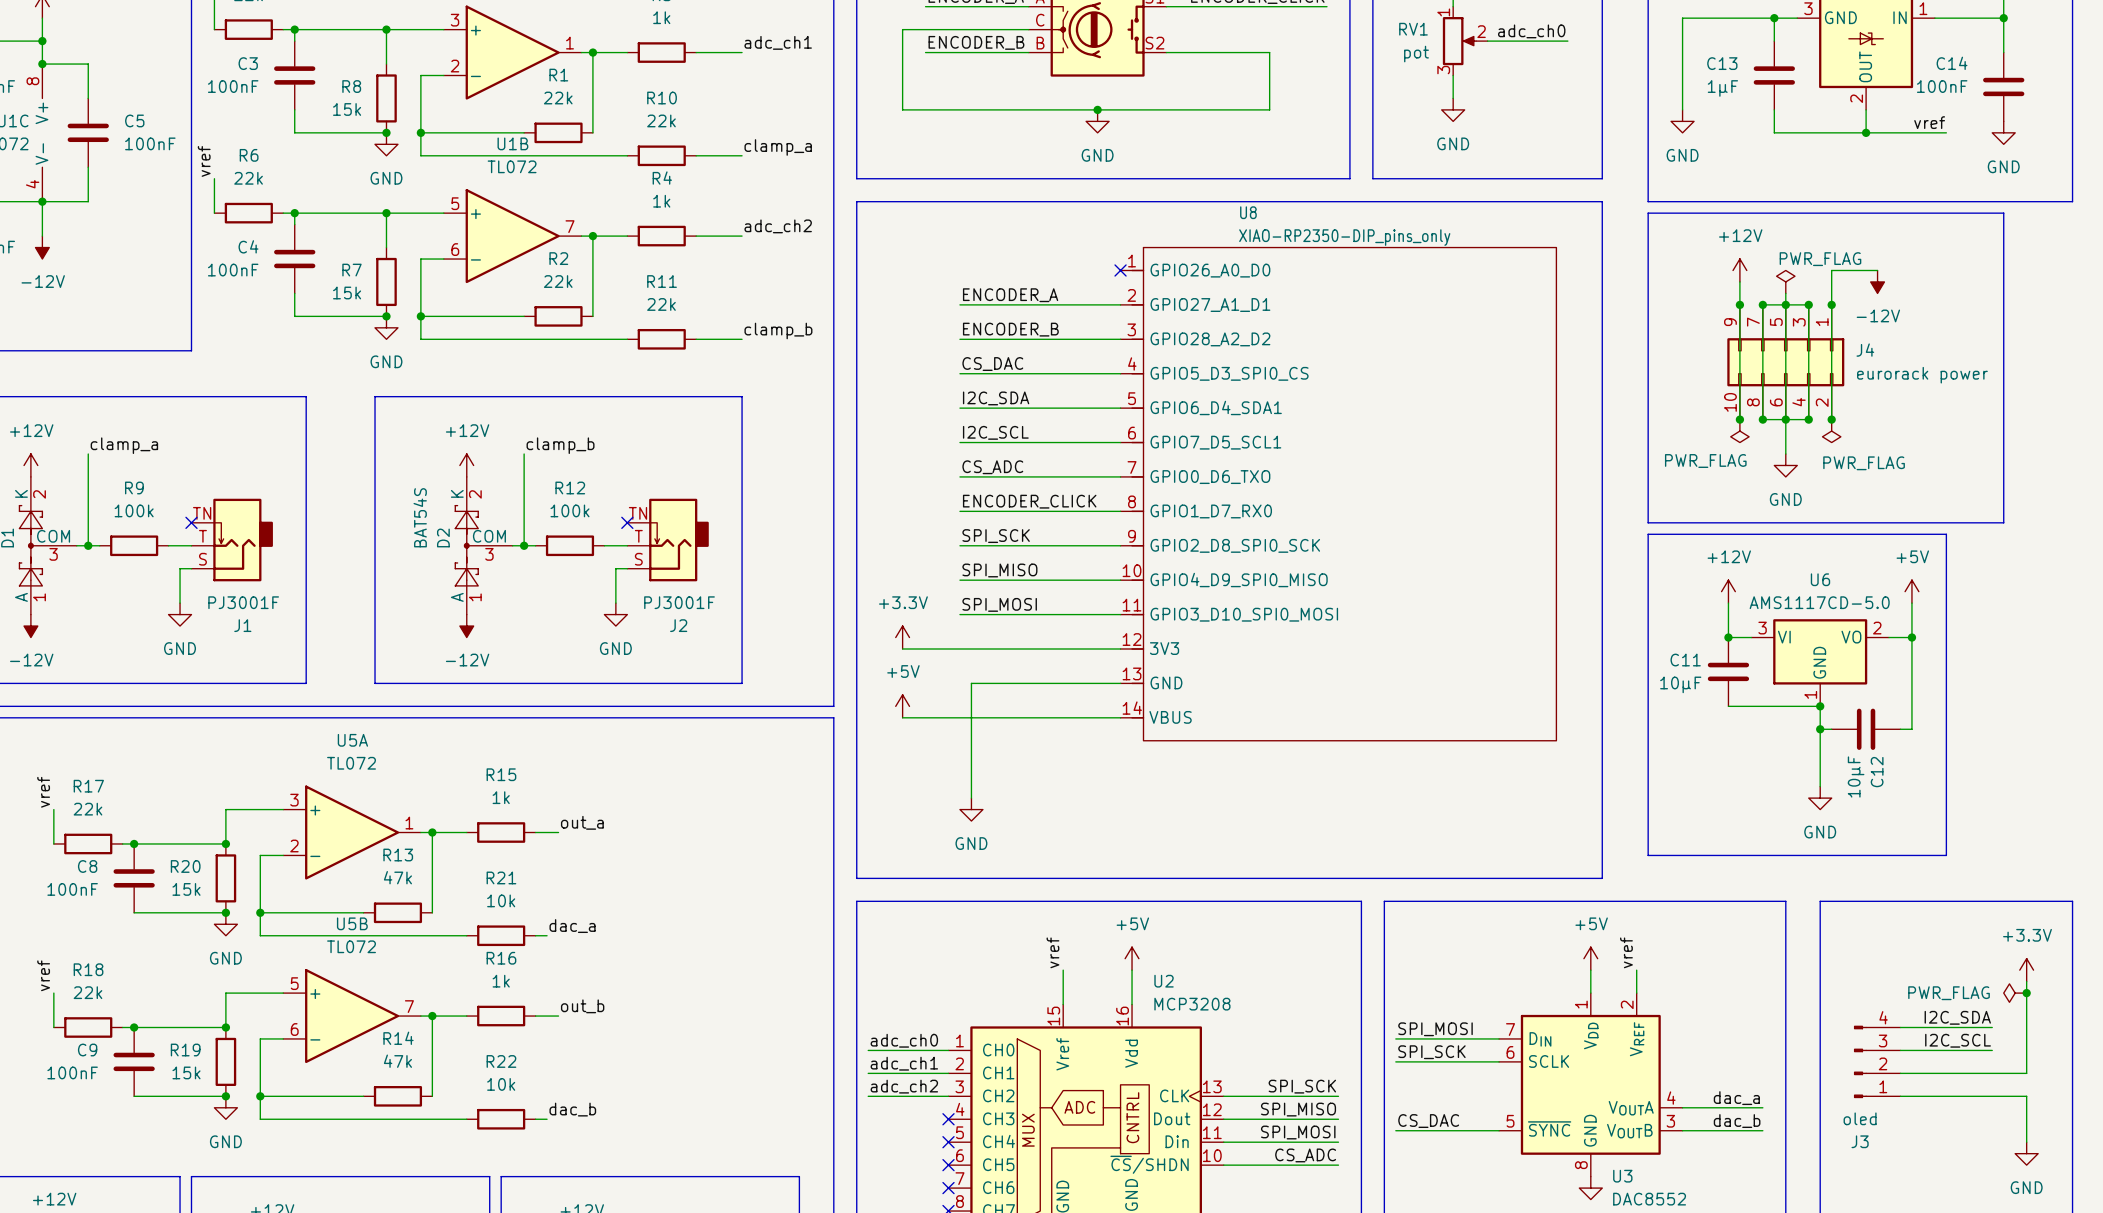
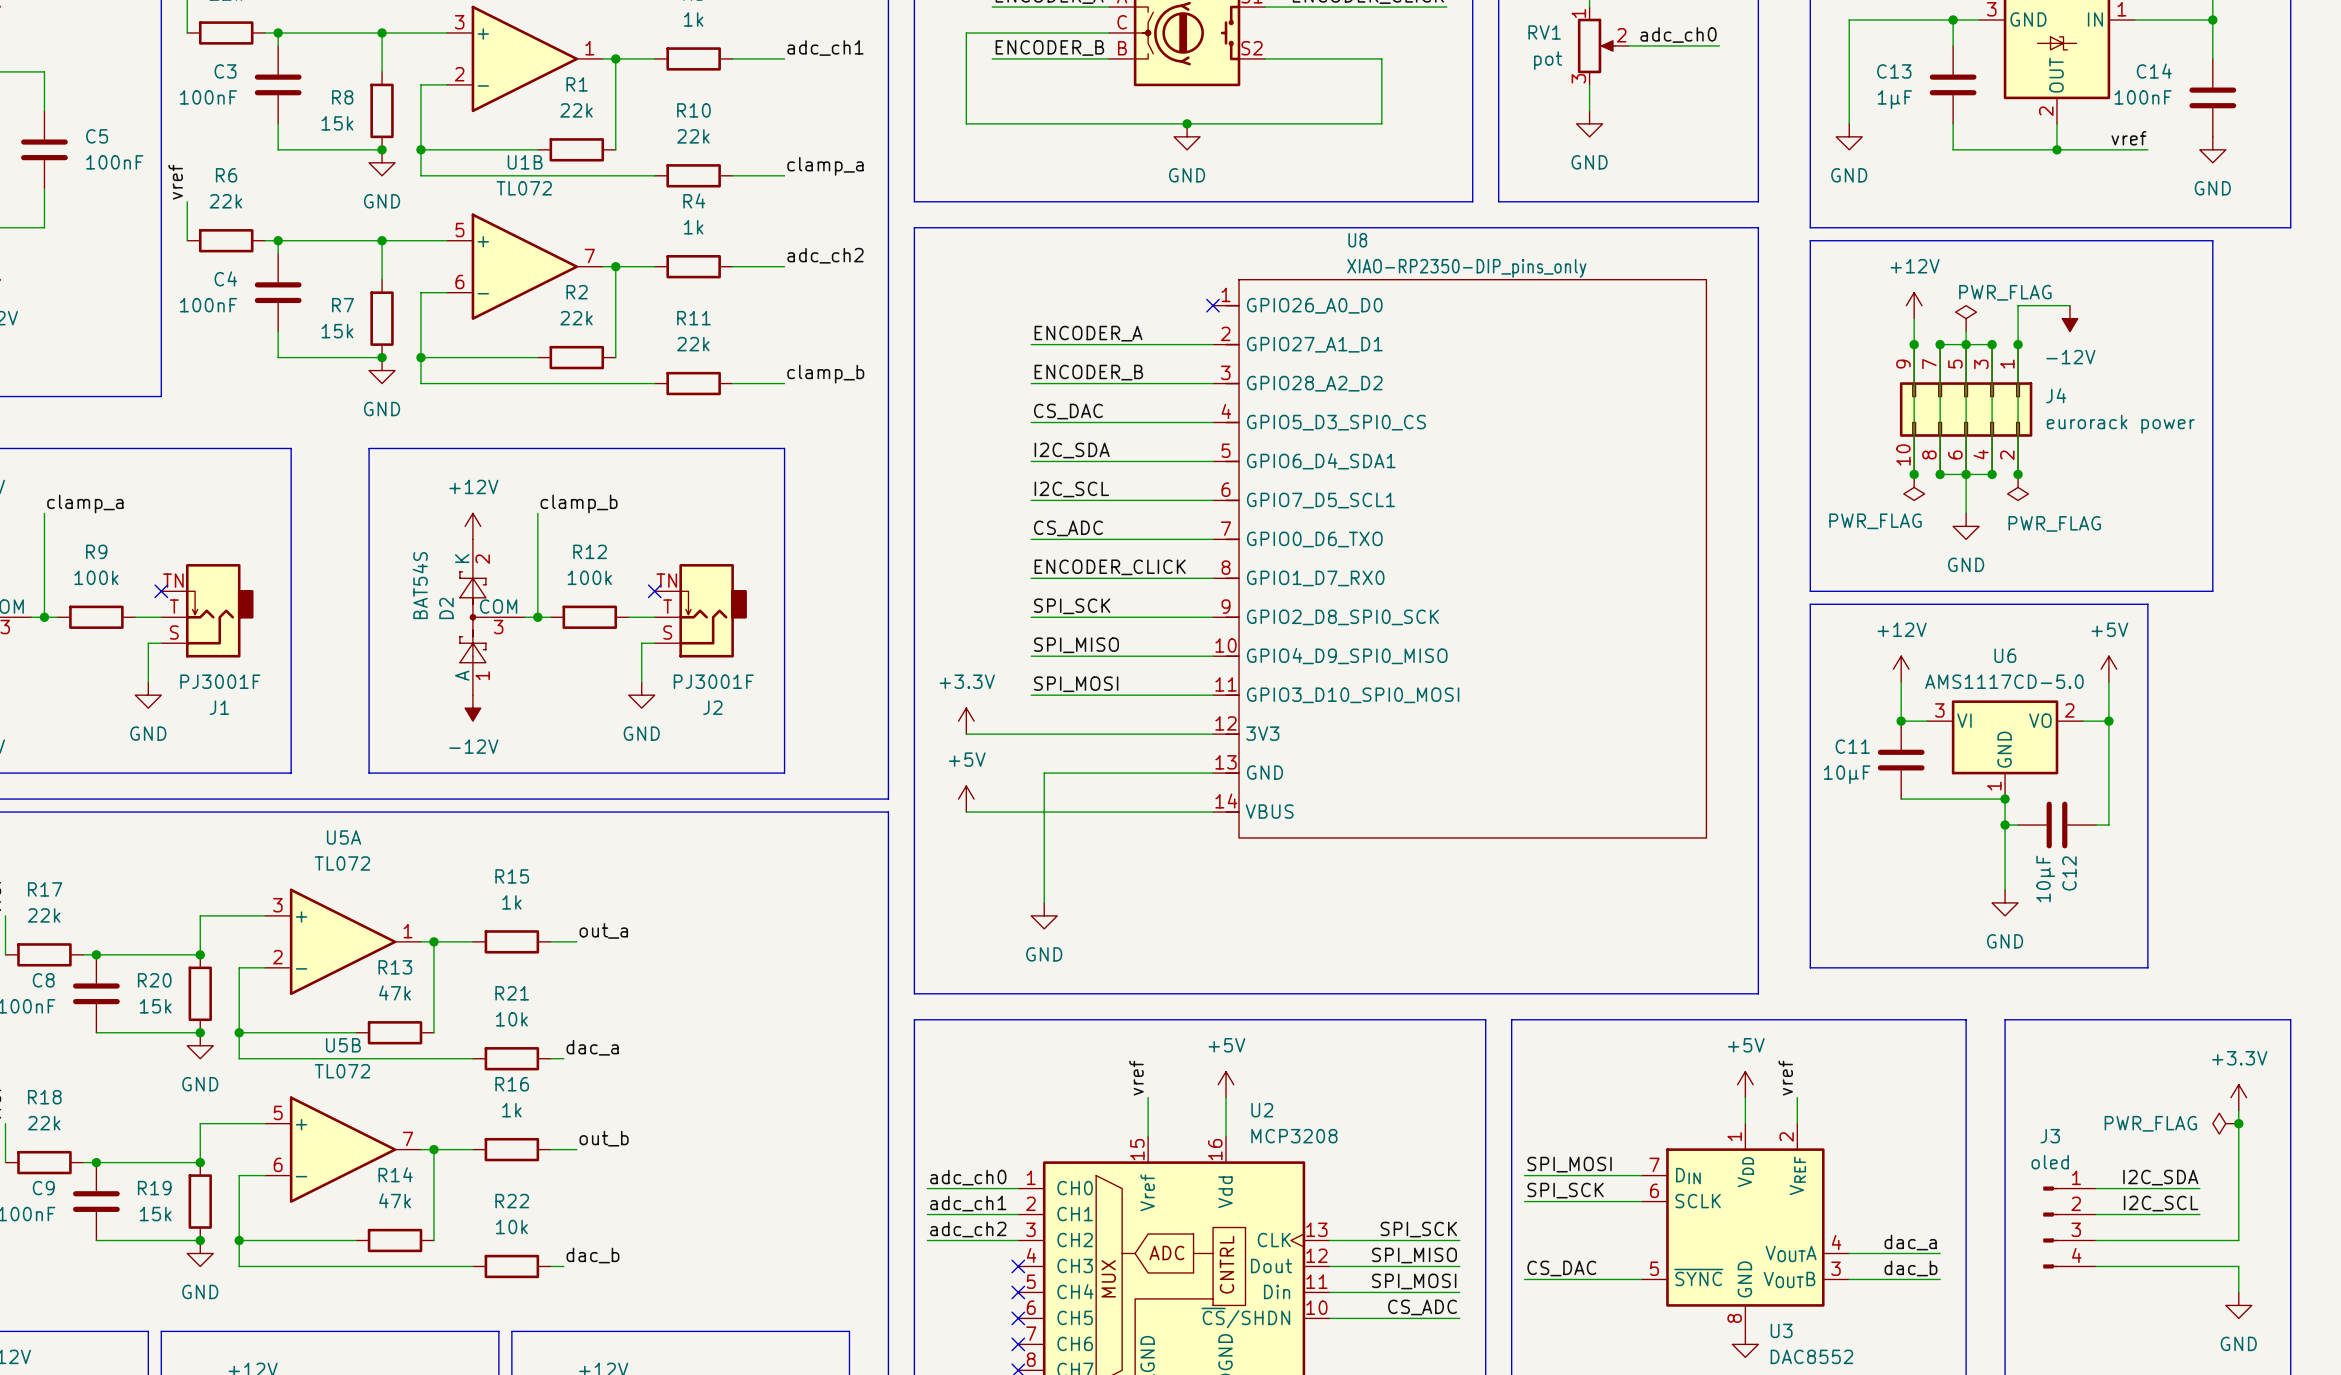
label: I2C_SDA (1957, 1017) -> none
wire: (1900, 1027) (1992, 1027) -> none
label: I2C_SCL (1958, 1040) -> I2C_SDA (2160, 1177)
J3 flip: as is (1860, 1061) -> up-down (2050, 1227)
label: none -> I2C_SCL (2161, 1203)
wire: (1992, 1073) (2026, 1073) -> (2238, 1240) (2238, 1214)
wire: (2026, 1096) (2026, 1119) -> (2095, 1266) (2238, 1266)

